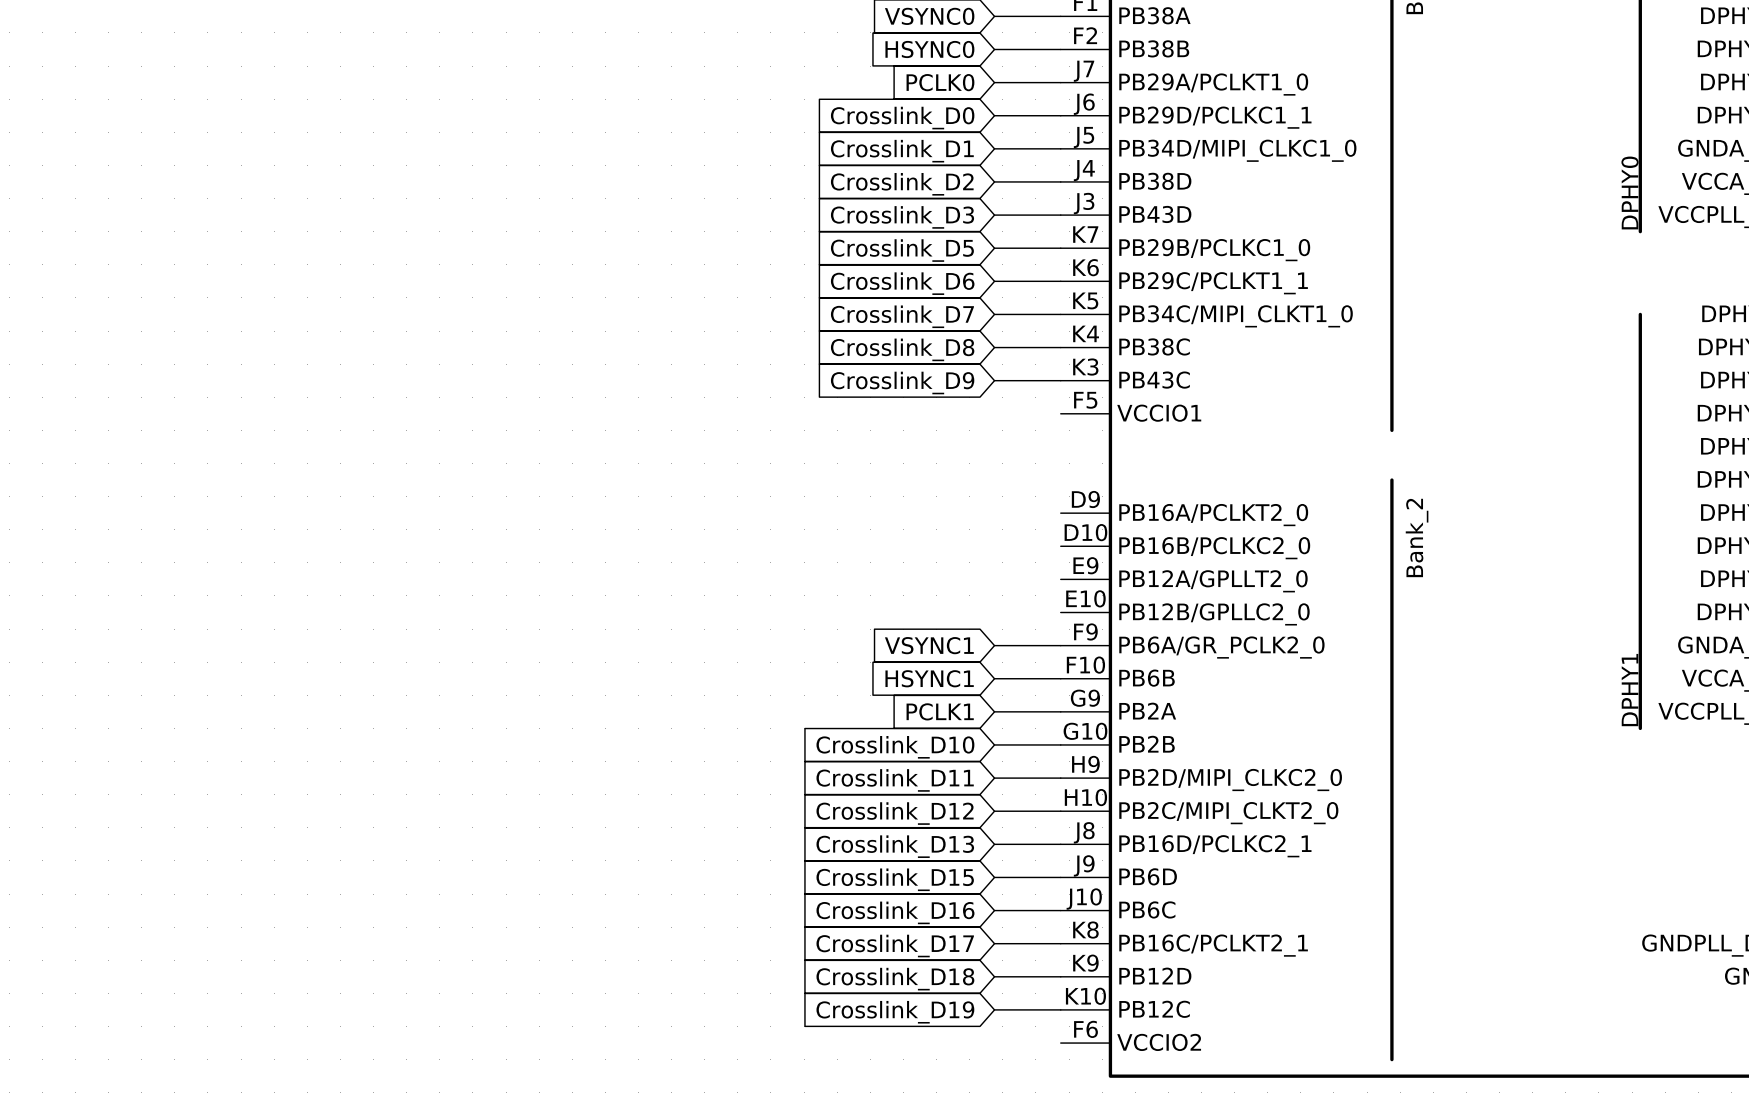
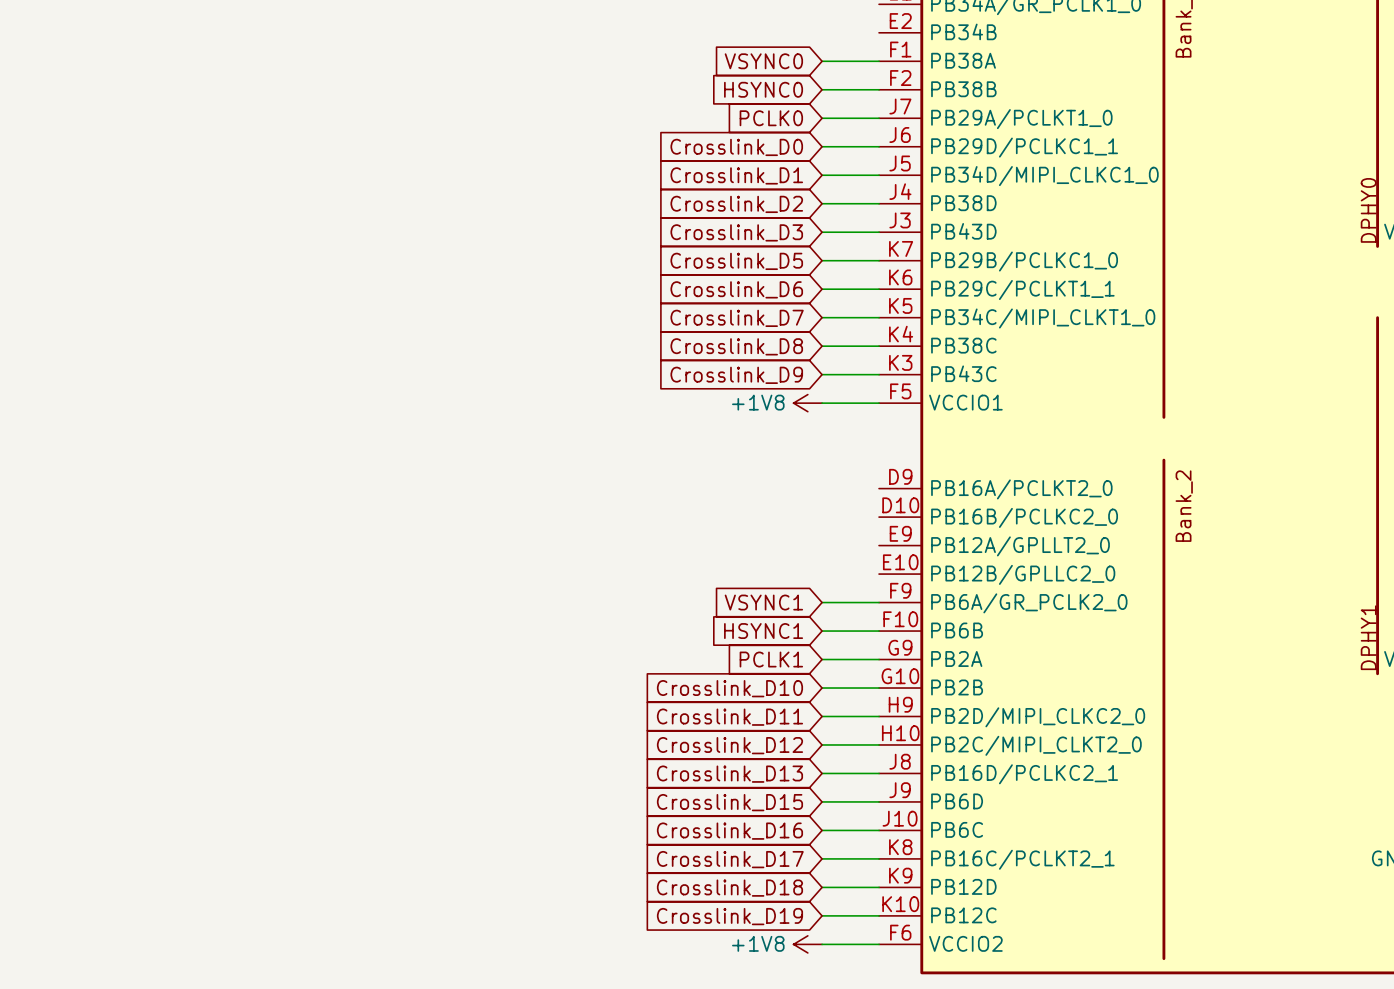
power symbol: none -> +1V8 (807, 403)
wire: none -> (822, 403) (879, 403)
power symbol: none -> +1V8 (807, 944)
wire: none -> (822, 944) (879, 944)

